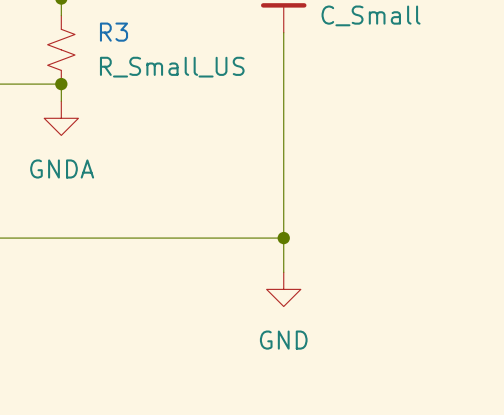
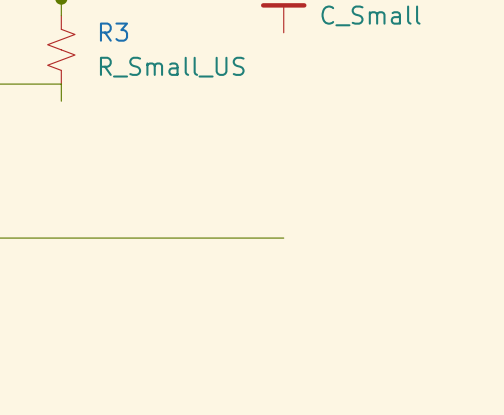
wire: (283, 32) (283, 272) -> none
junction: (61, 84) -> none
power symbol: GNDA (61, 118) -> none
junction: (283, 238) -> none
power symbol: GND (283, 289) -> none

